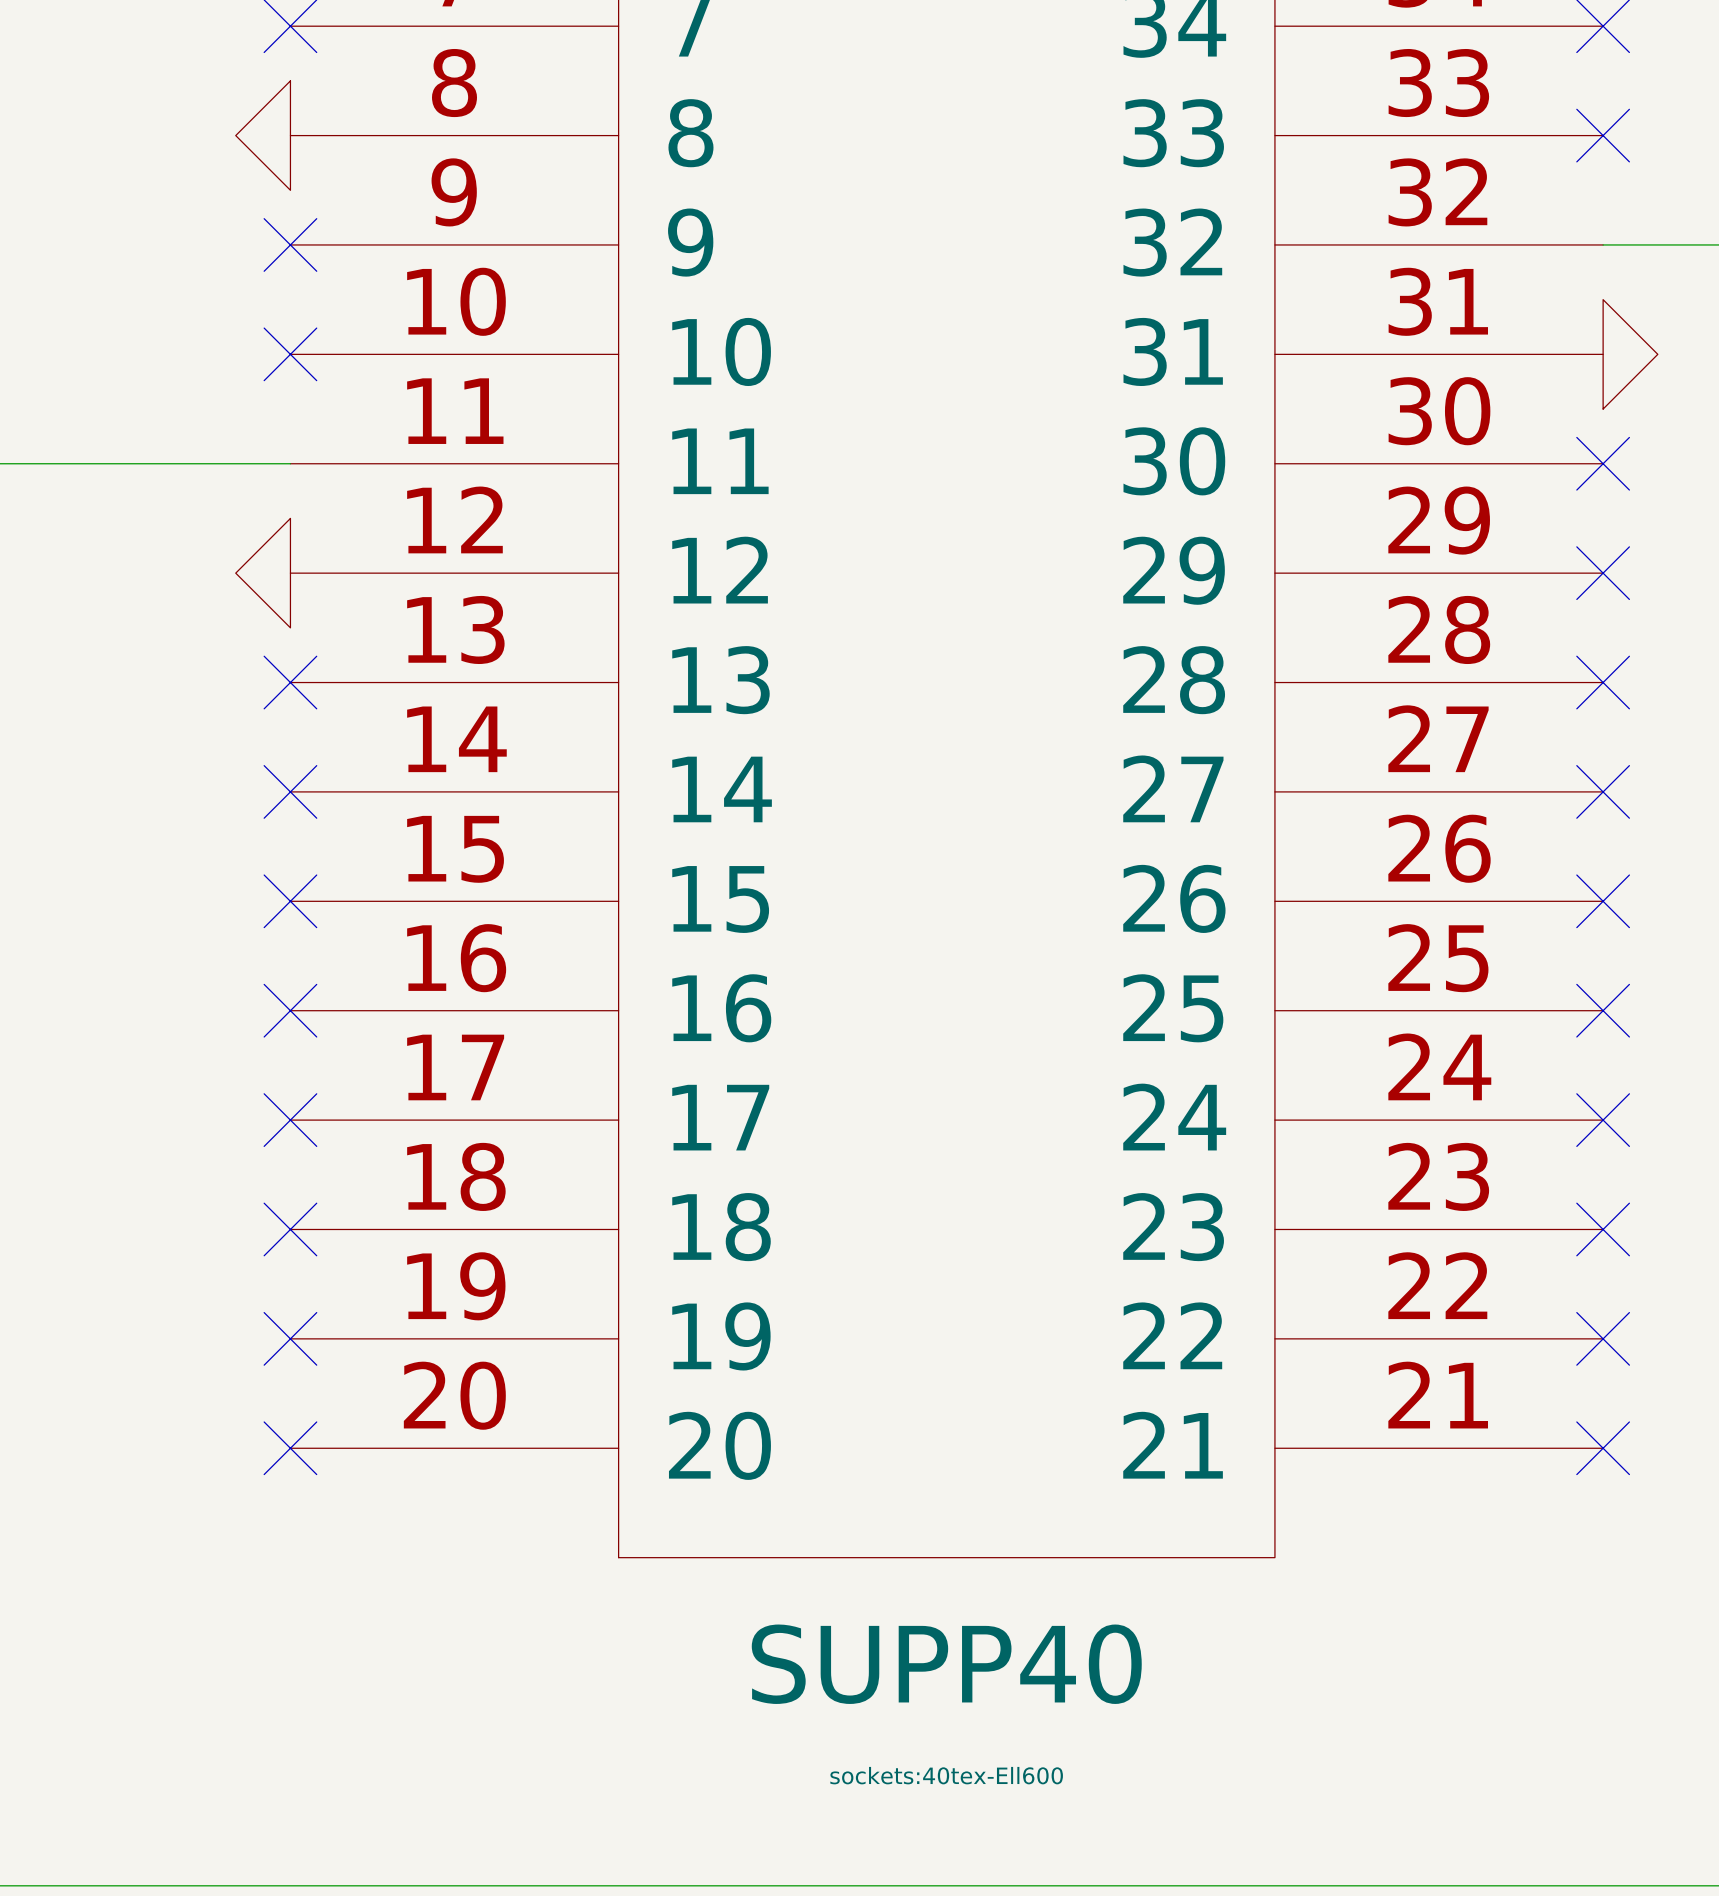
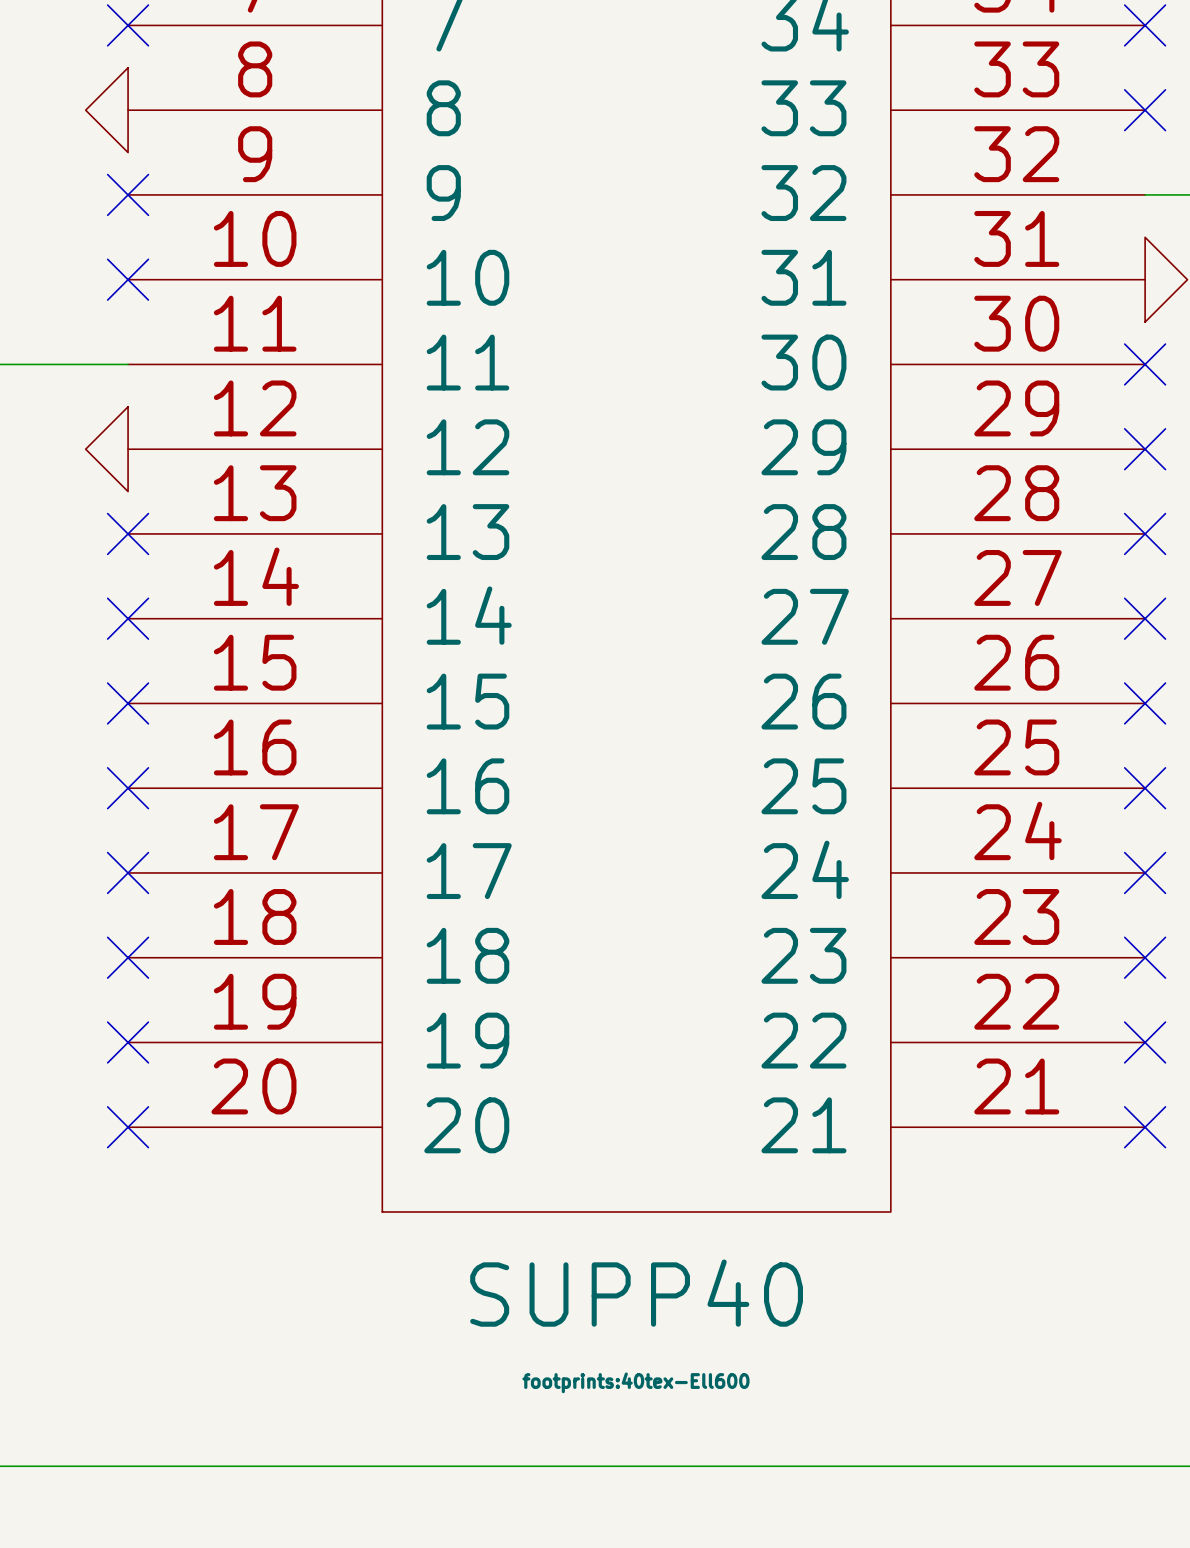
part text: sockets:40tex-Ell600 (946, 1775) -> footprints:40tex-Ell600 (635, 1382)

